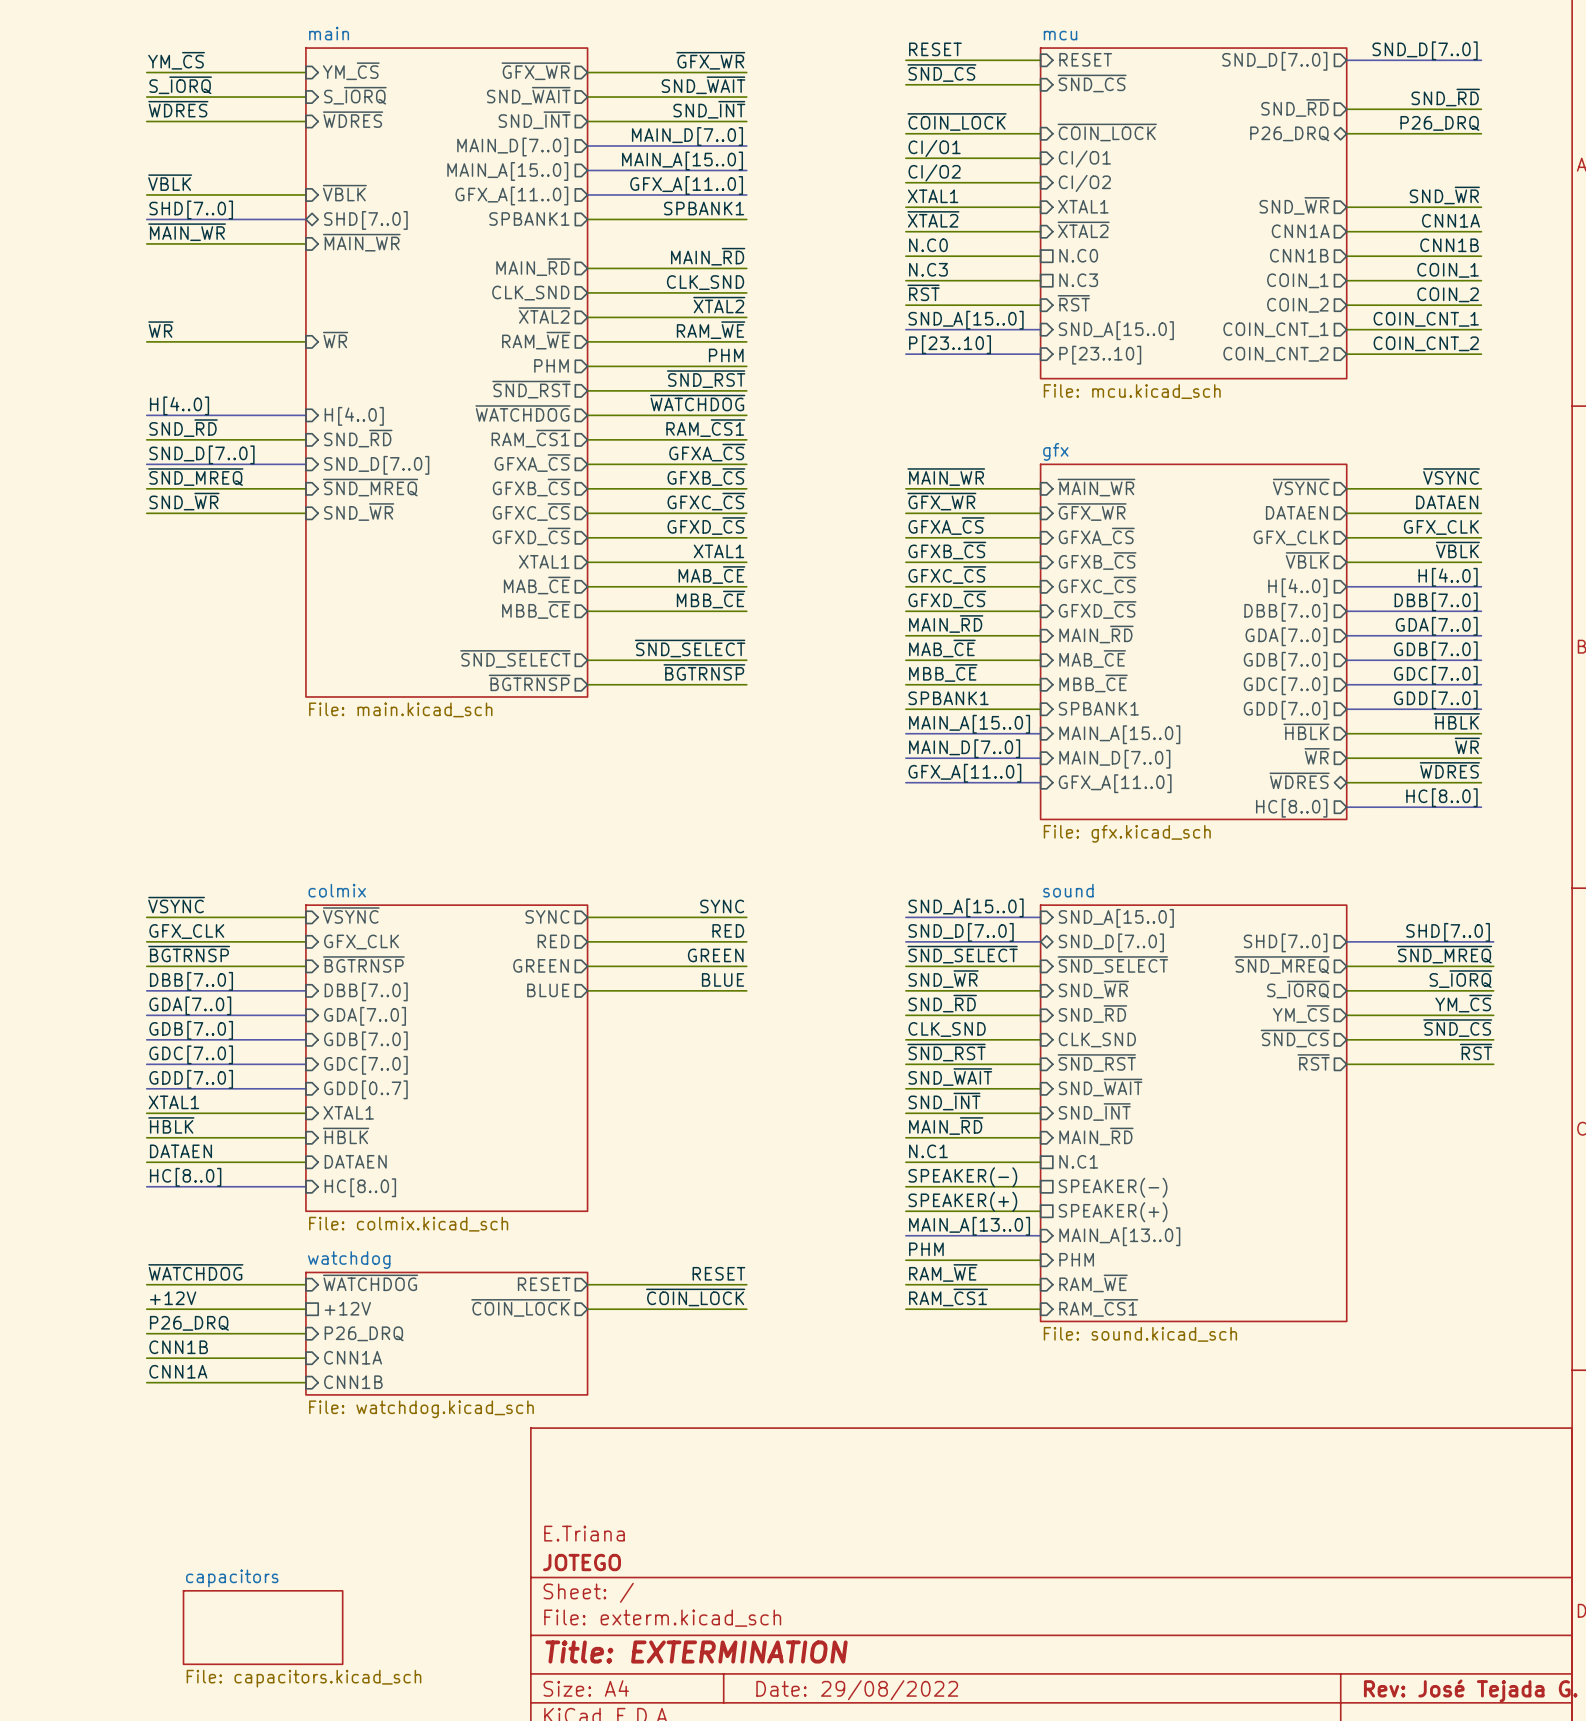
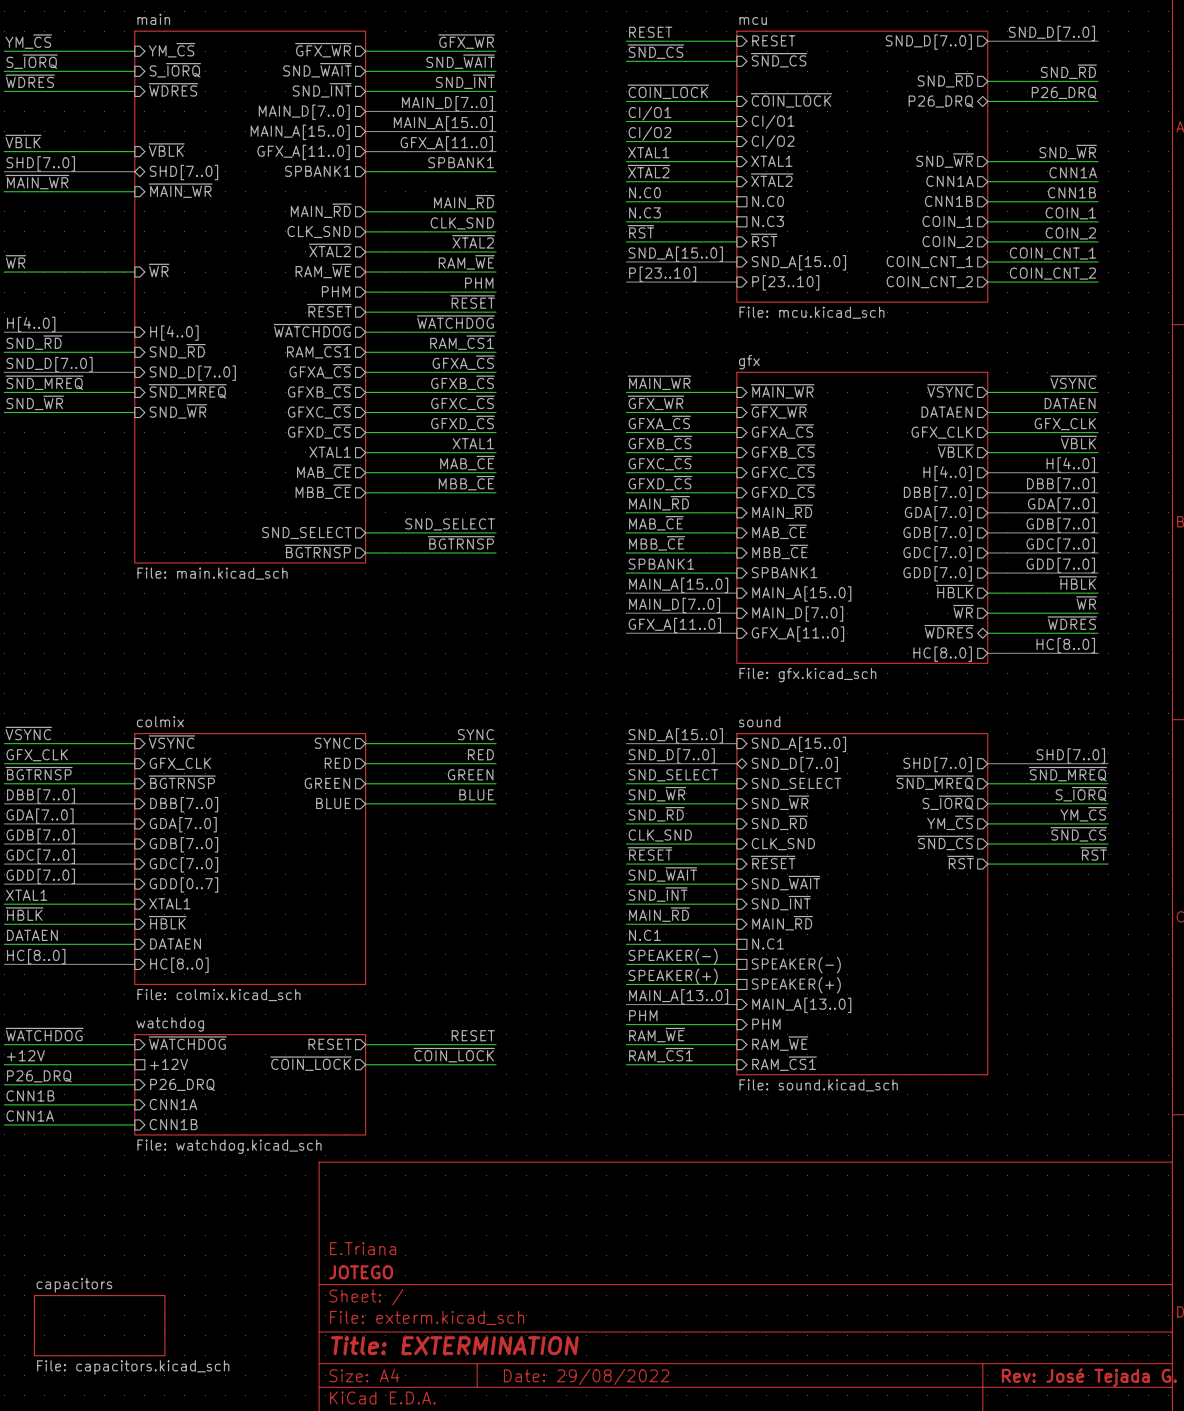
label: ~{SND_RST} (706, 379) -> ~{RESET} (472, 302)
sheet pin: ~{SND_RST} (531, 389) -> ~{RESET} (329, 310)
label: ~{SND_SELECT} (690, 648) -> SND_SELECT (450, 524)
sheet pin: ~{SND_SELECT} (515, 658) -> SND_SELECT (306, 533)
label: ~{SND_SELECT} (962, 954) -> SND_SELECT (673, 775)
sheet pin: ~{SND_SELECT} (1112, 965) -> SND_SELECT (796, 783)
label: ~{SND_RST} (946, 1052) -> ~{RESET} (650, 853)
sheet pin: ~{SND_RST} (1096, 1063) -> ~{RESET} (773, 862)

